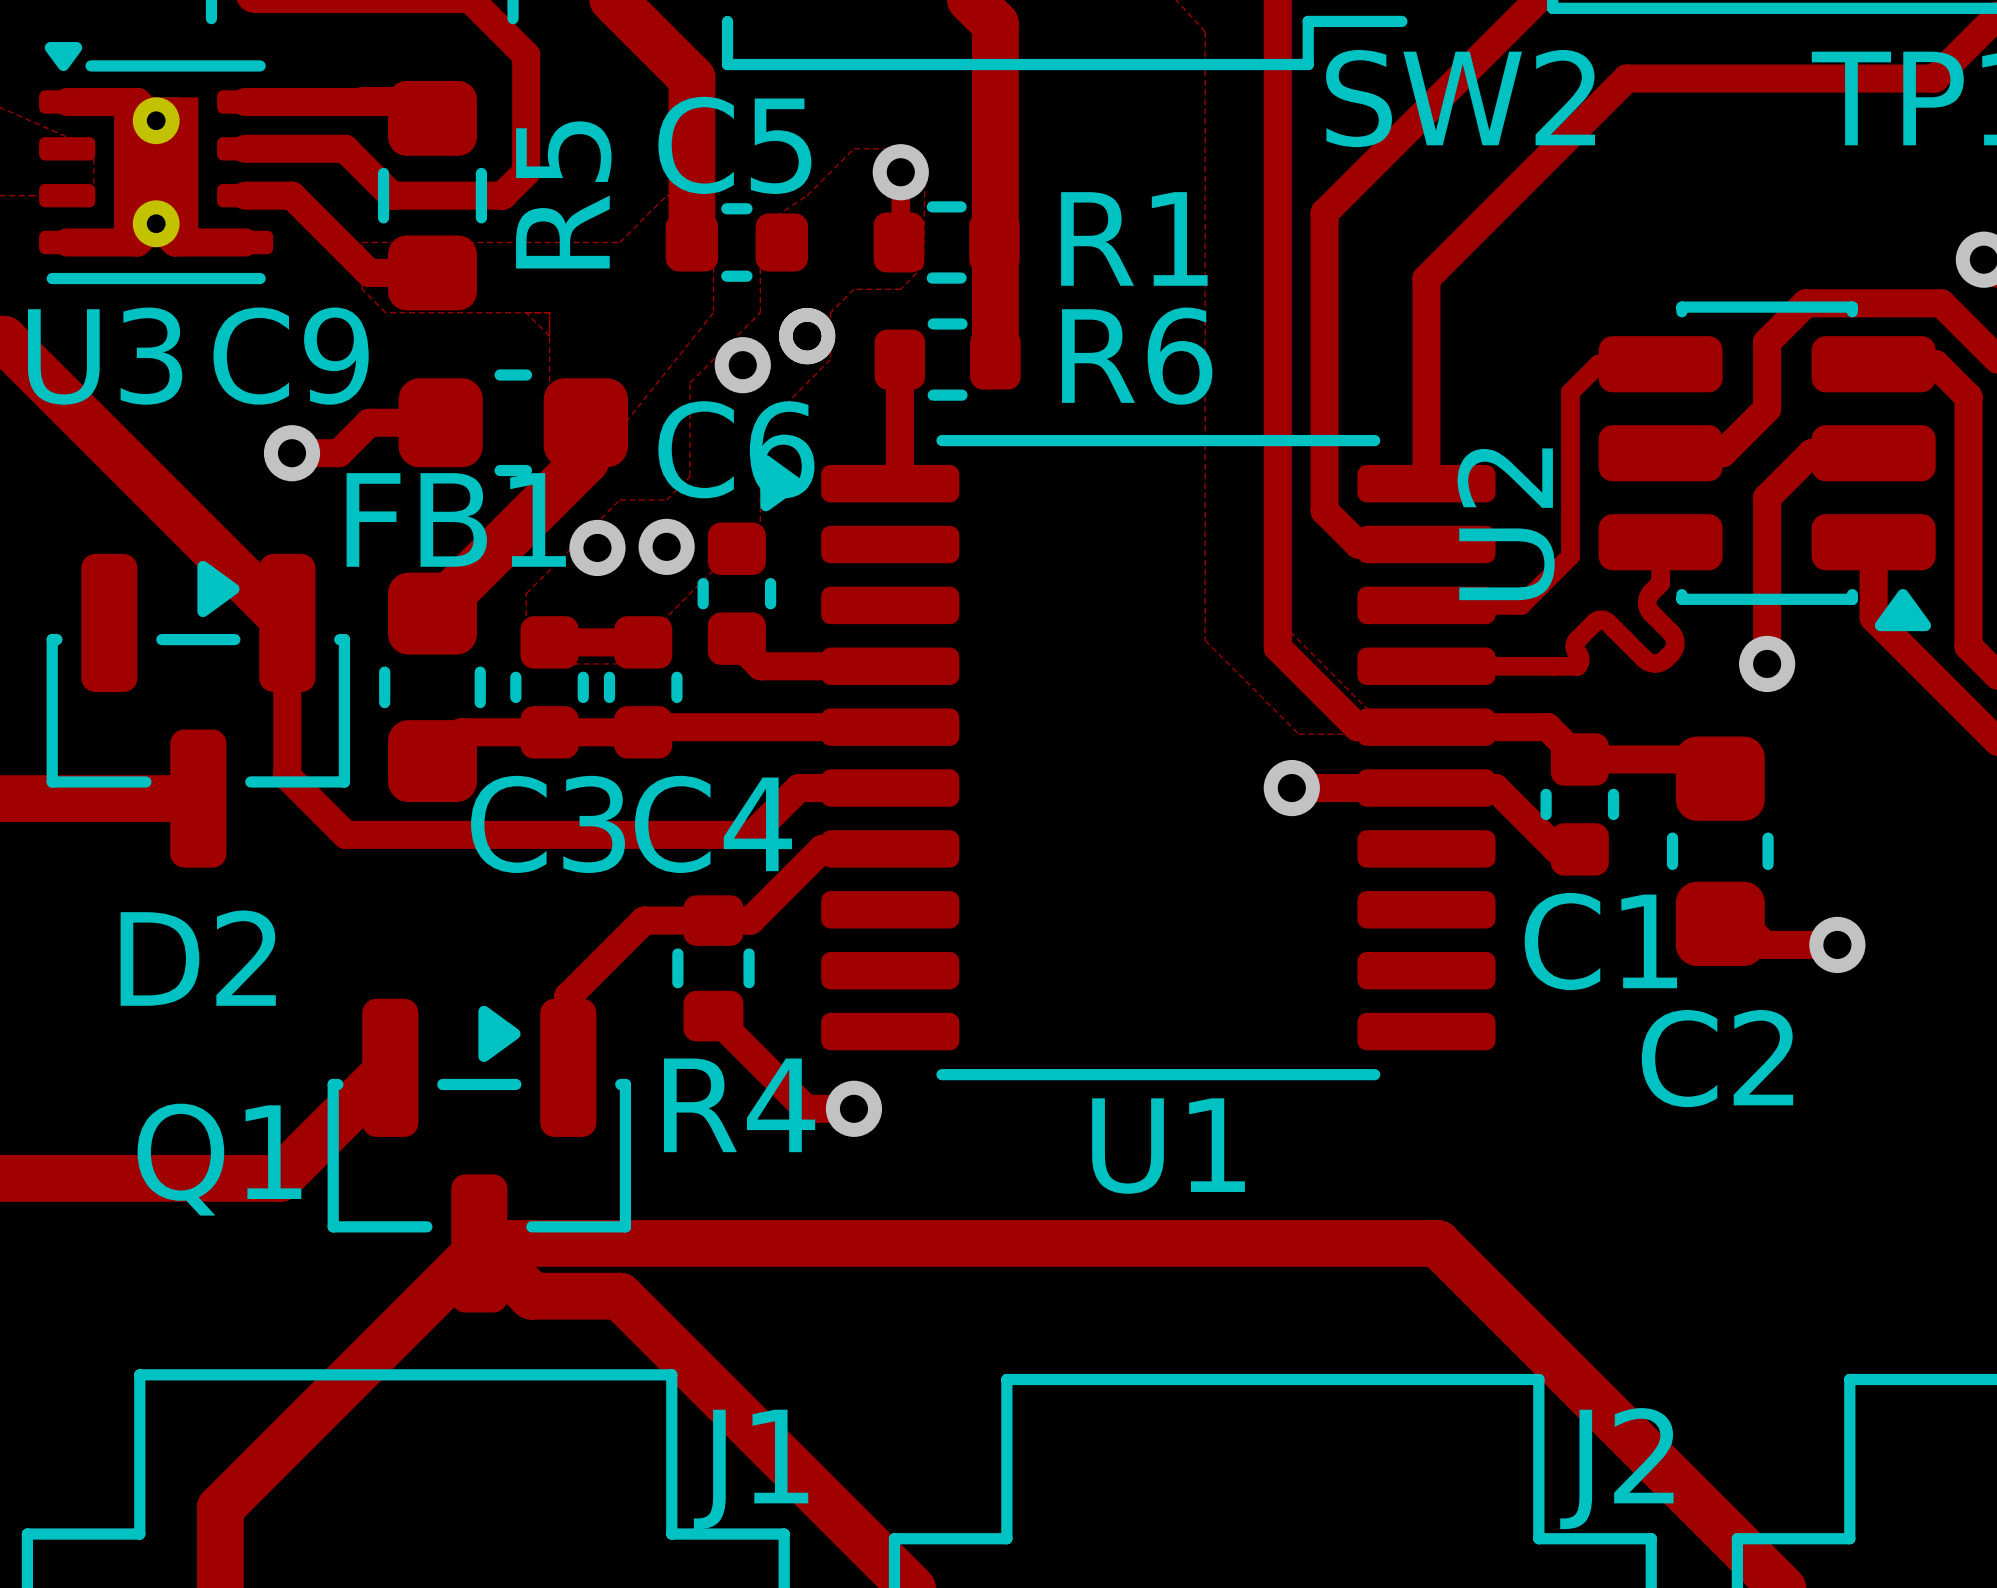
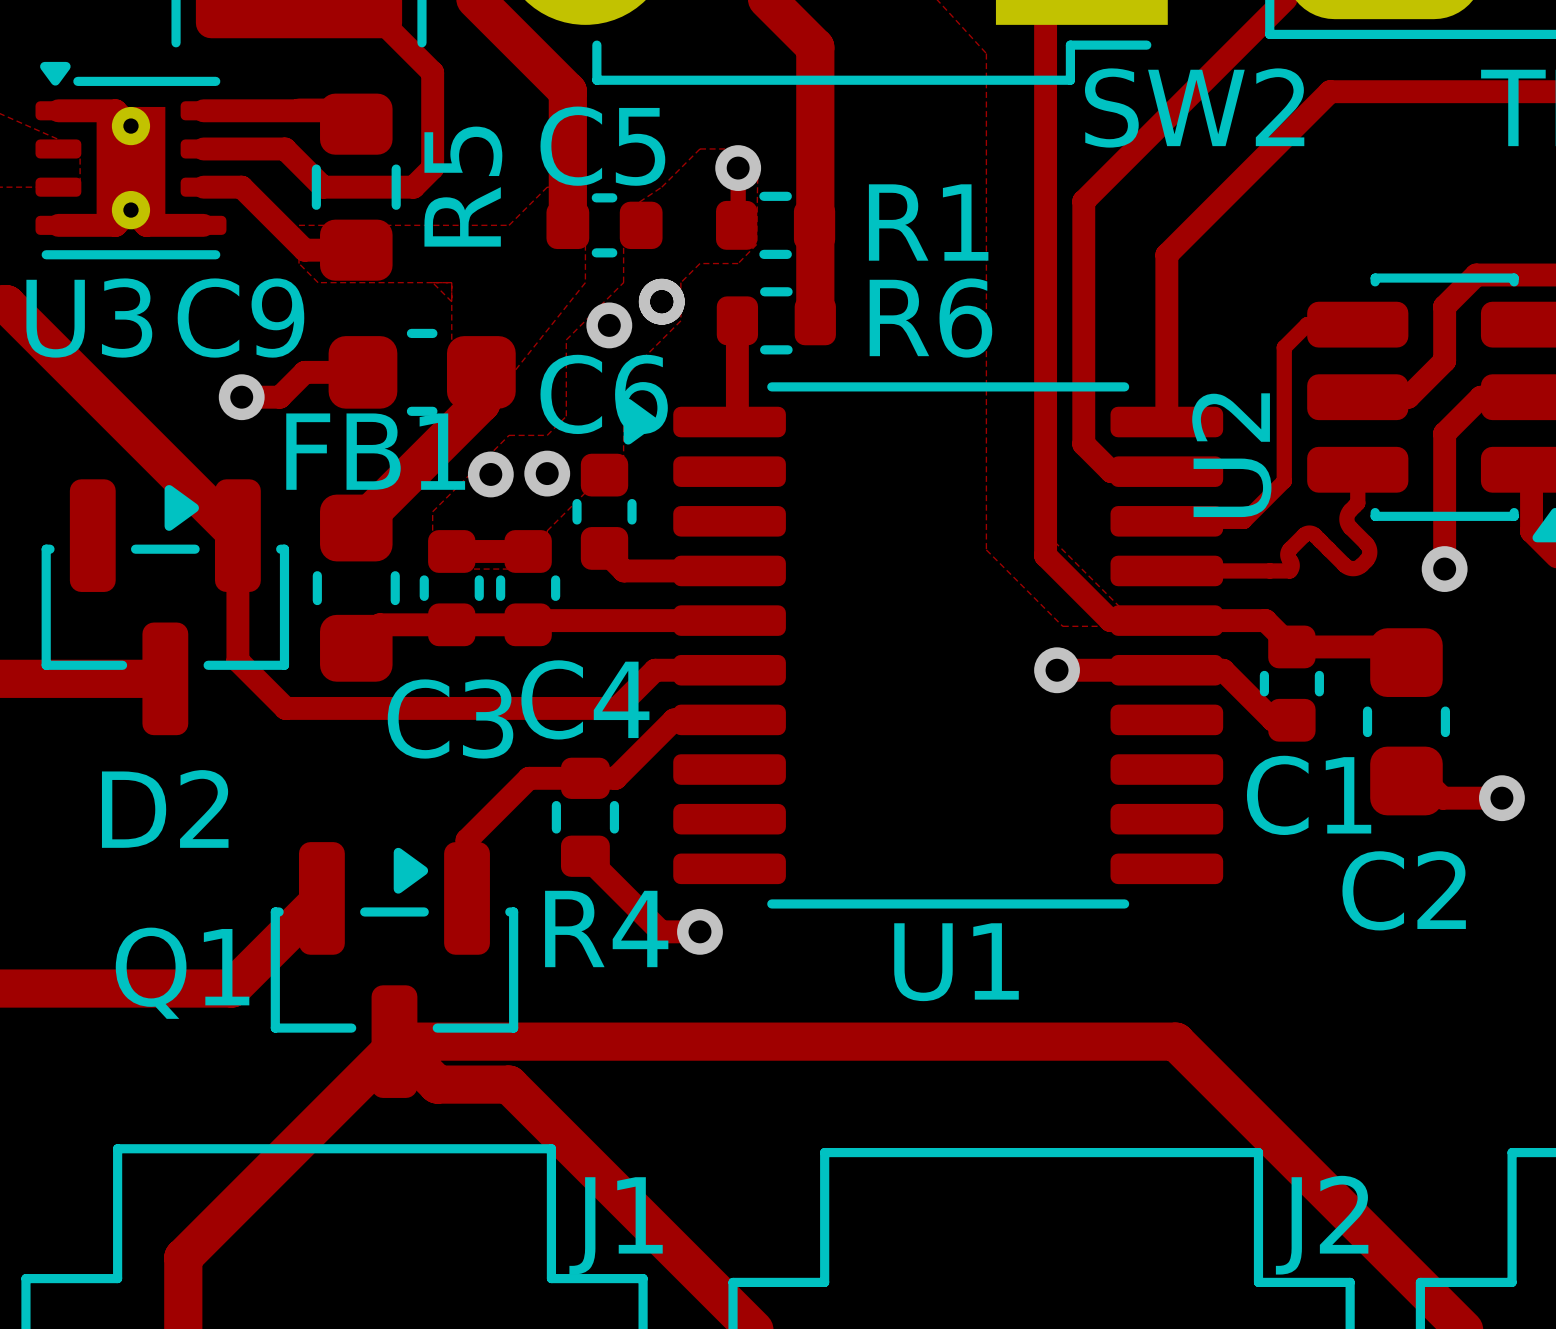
C3 name position: C3 (548, 824) -> C3 (450, 719)

